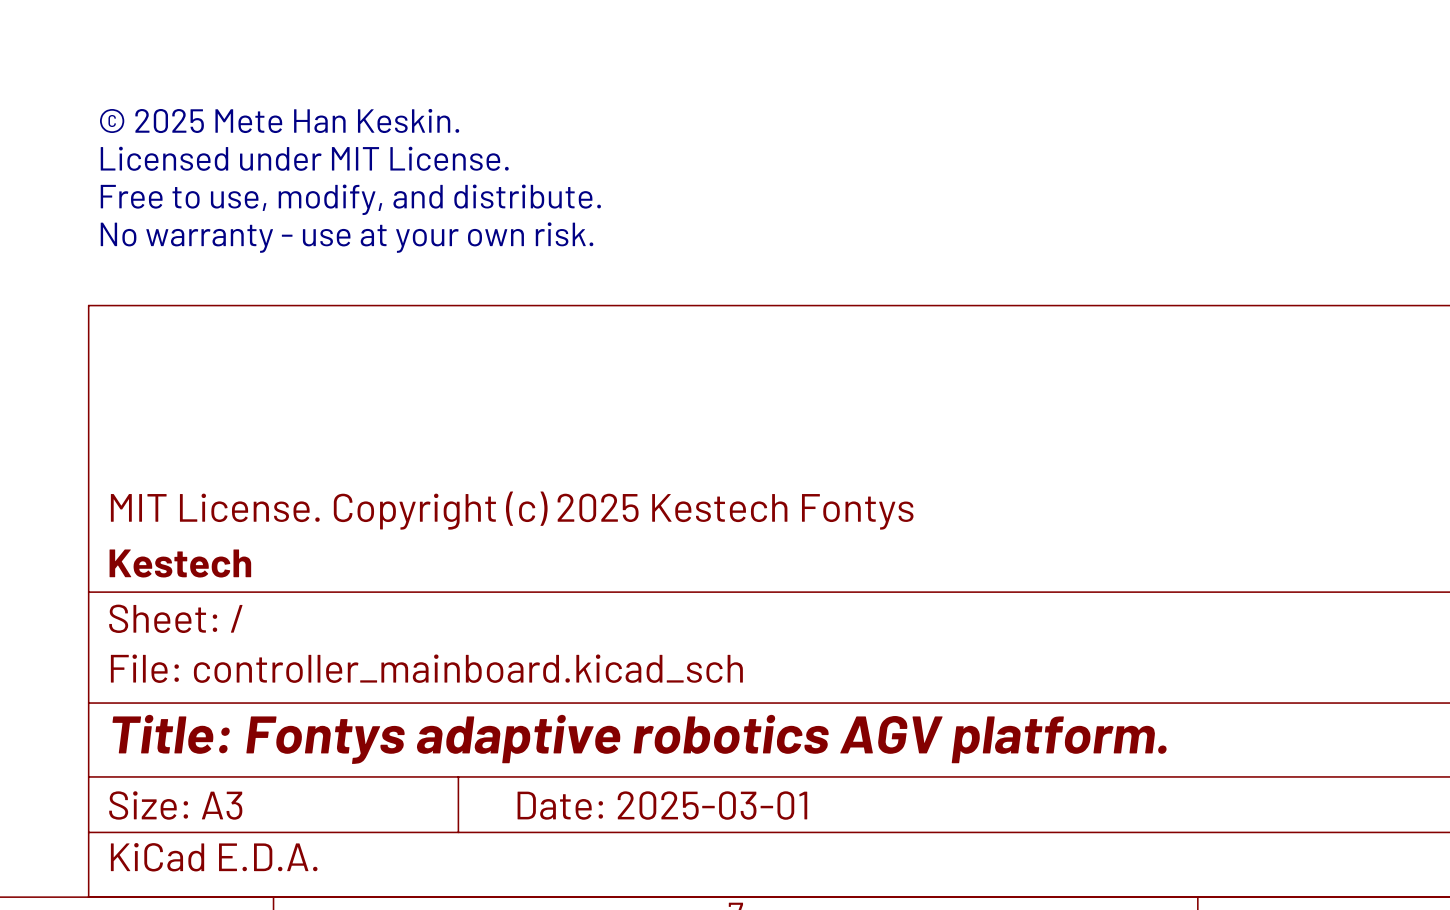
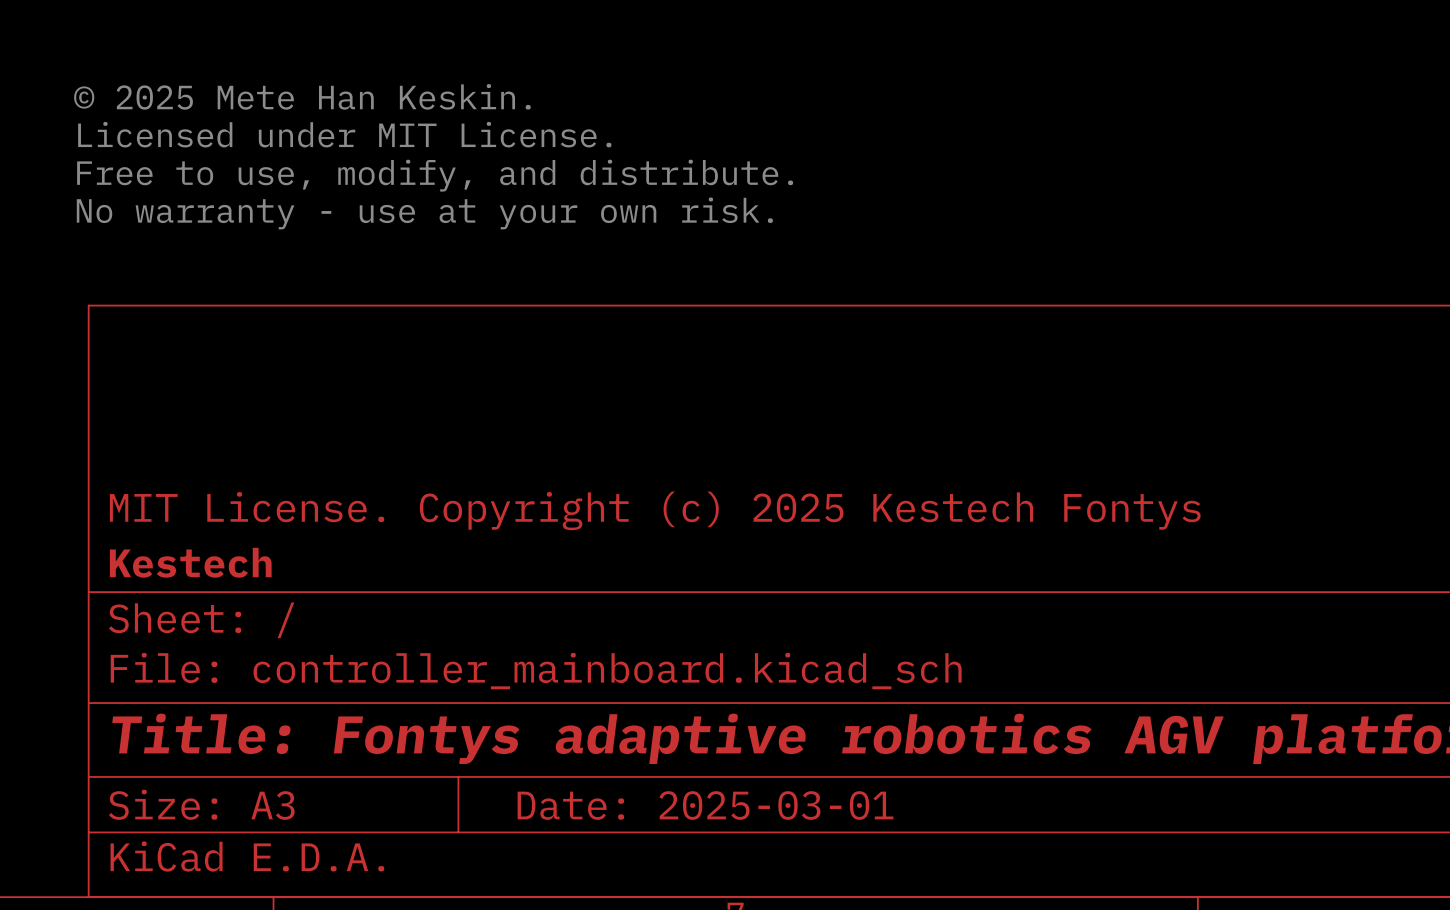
text position: © 2025 Mete Han Keskin. (279, 121) -> © 2025 Mete Han Keskin. (302, 96)
text position: Licensed under MIT License. (304, 158) -> Licensed under MIT License. (344, 134)
text position: Free to use, modify, and distribute. (350, 199) -> Free to use, modify, and distribute. (435, 175)
text position: No warranty - use at your own risk. (347, 237) -> No warranty - use at your own risk. (424, 213)

